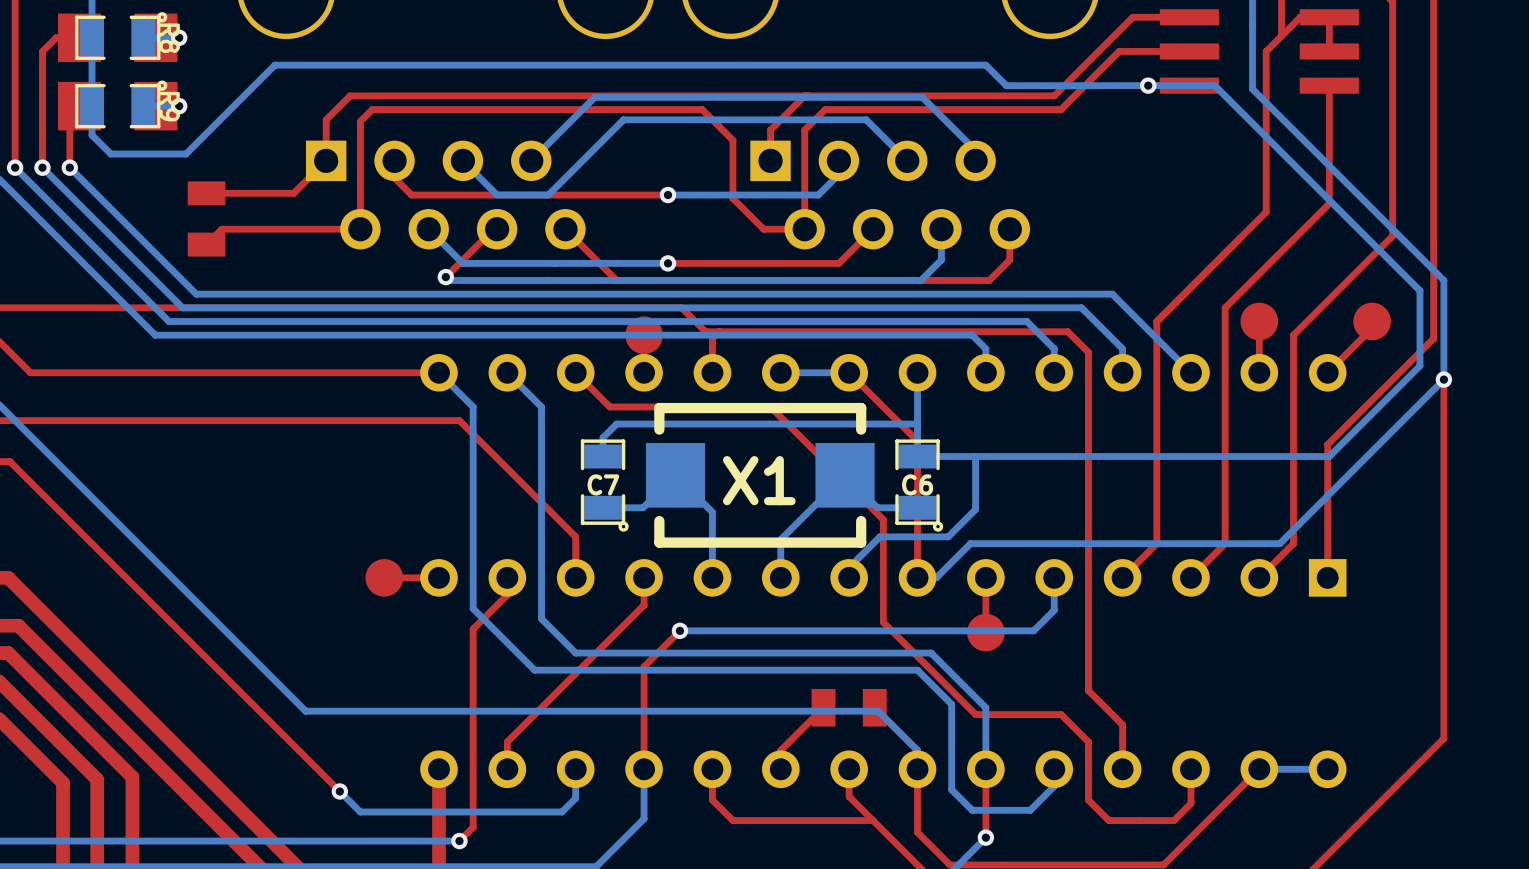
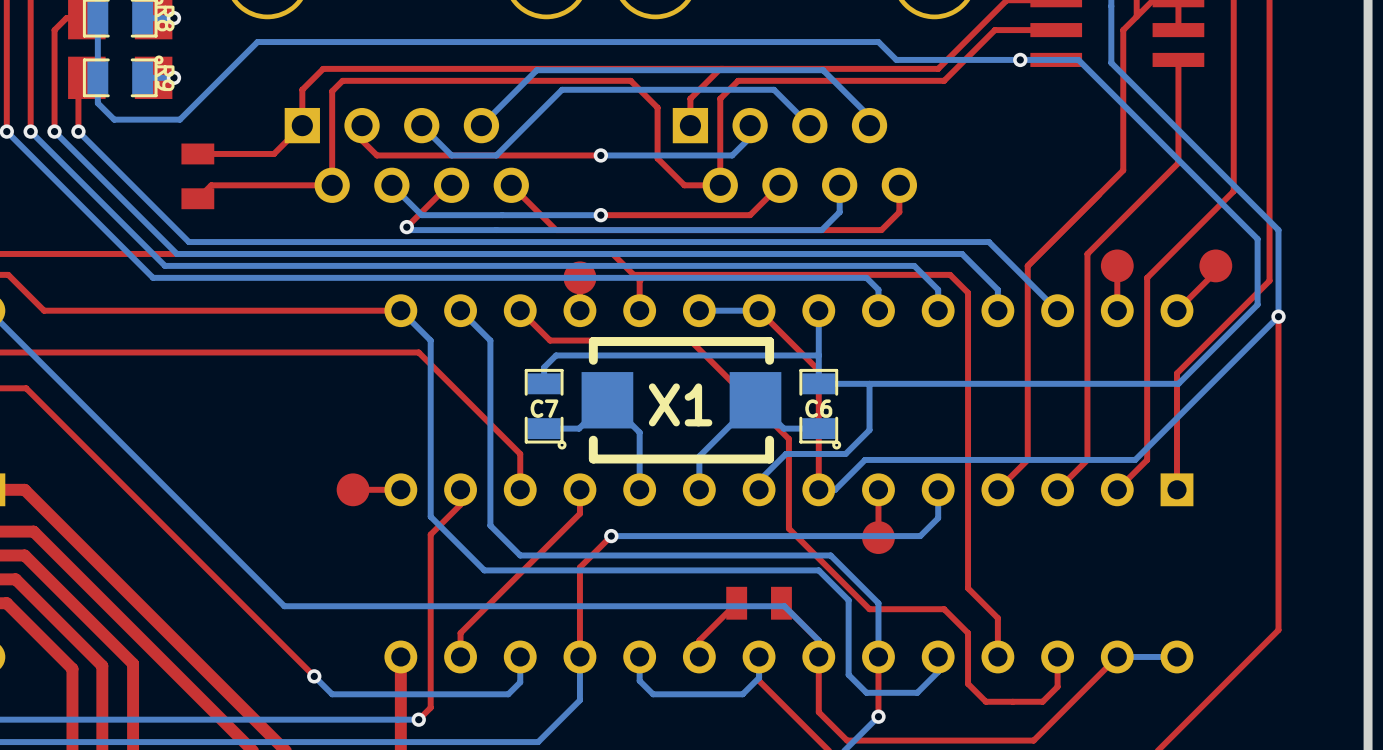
top track: (712, 769) (712, 800) (732, 820) (873, 820) -> none
bottom track: none -> (759, 656) (759, 677) (742, 694) (653, 694) (639, 680) (639, 656)

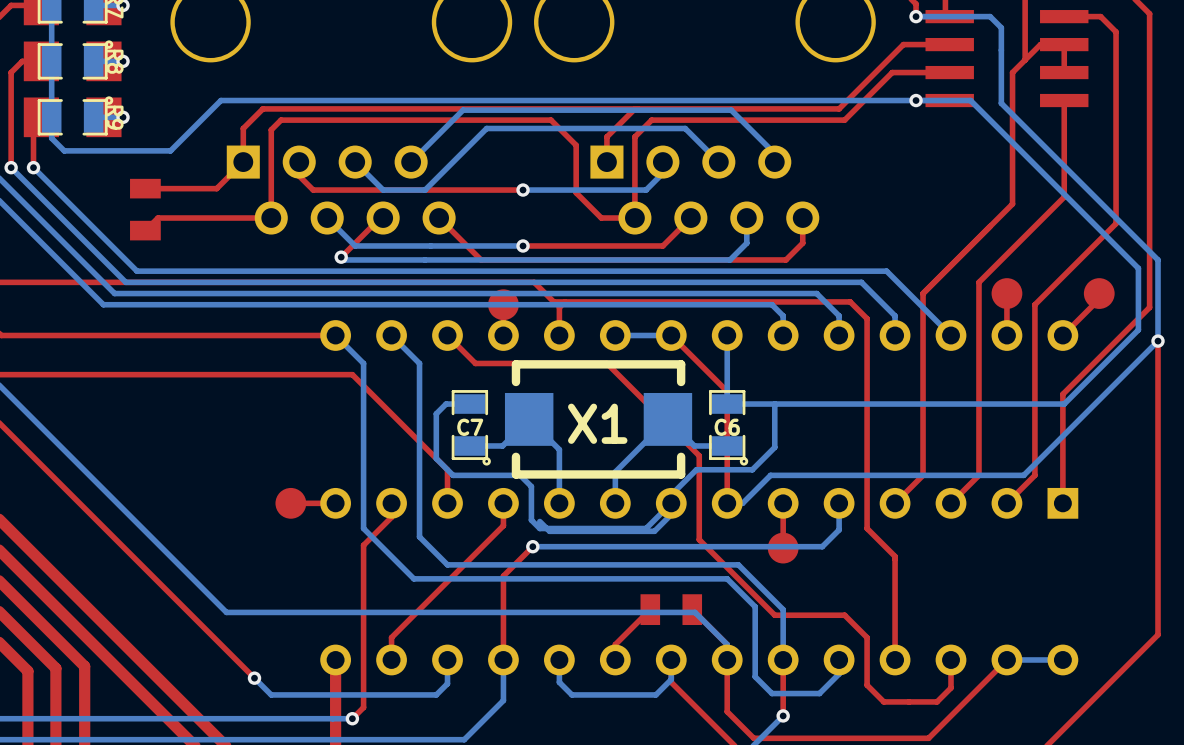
bottom track: (896, 59) (878, 42) (257, 42) (179, 119) (114, 119) (97, 103) (97, 100) -> (799, 100) (220, 100) (170, 150) (64, 150) (51, 138)
bottom track: (818, 355) (556, 355) (544, 367) (544, 383) -> (539, 521) (549, 531) (654, 531) (671, 514) (671, 503) (646, 528) (539, 528) (531, 520) (531, 486) (520, 475) (453, 475) (436, 458) (436, 413) (446, 404) (469, 404)
top track: (968, 516) (968, 588) (997, 618) -> (867, 528) (895, 556) (895, 623)

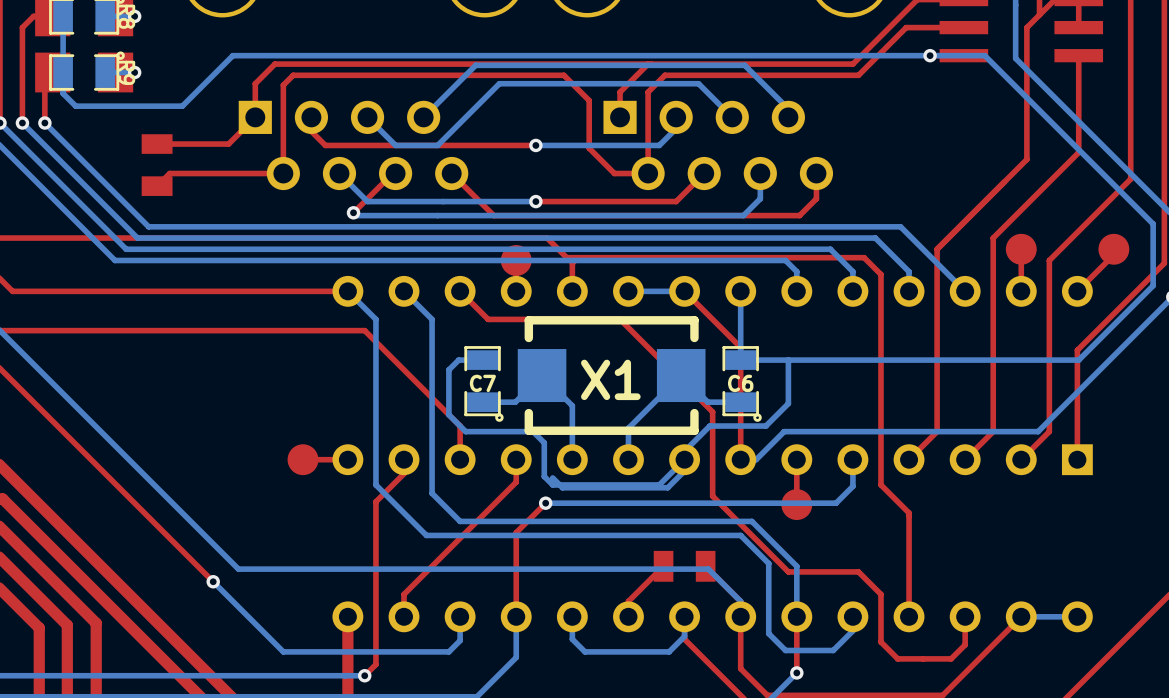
bottom track: none -> (213, 581) (266, 635)
top track: (201, 625) (254, 678) -> none
via position: (254, 678) -> (213, 581)

